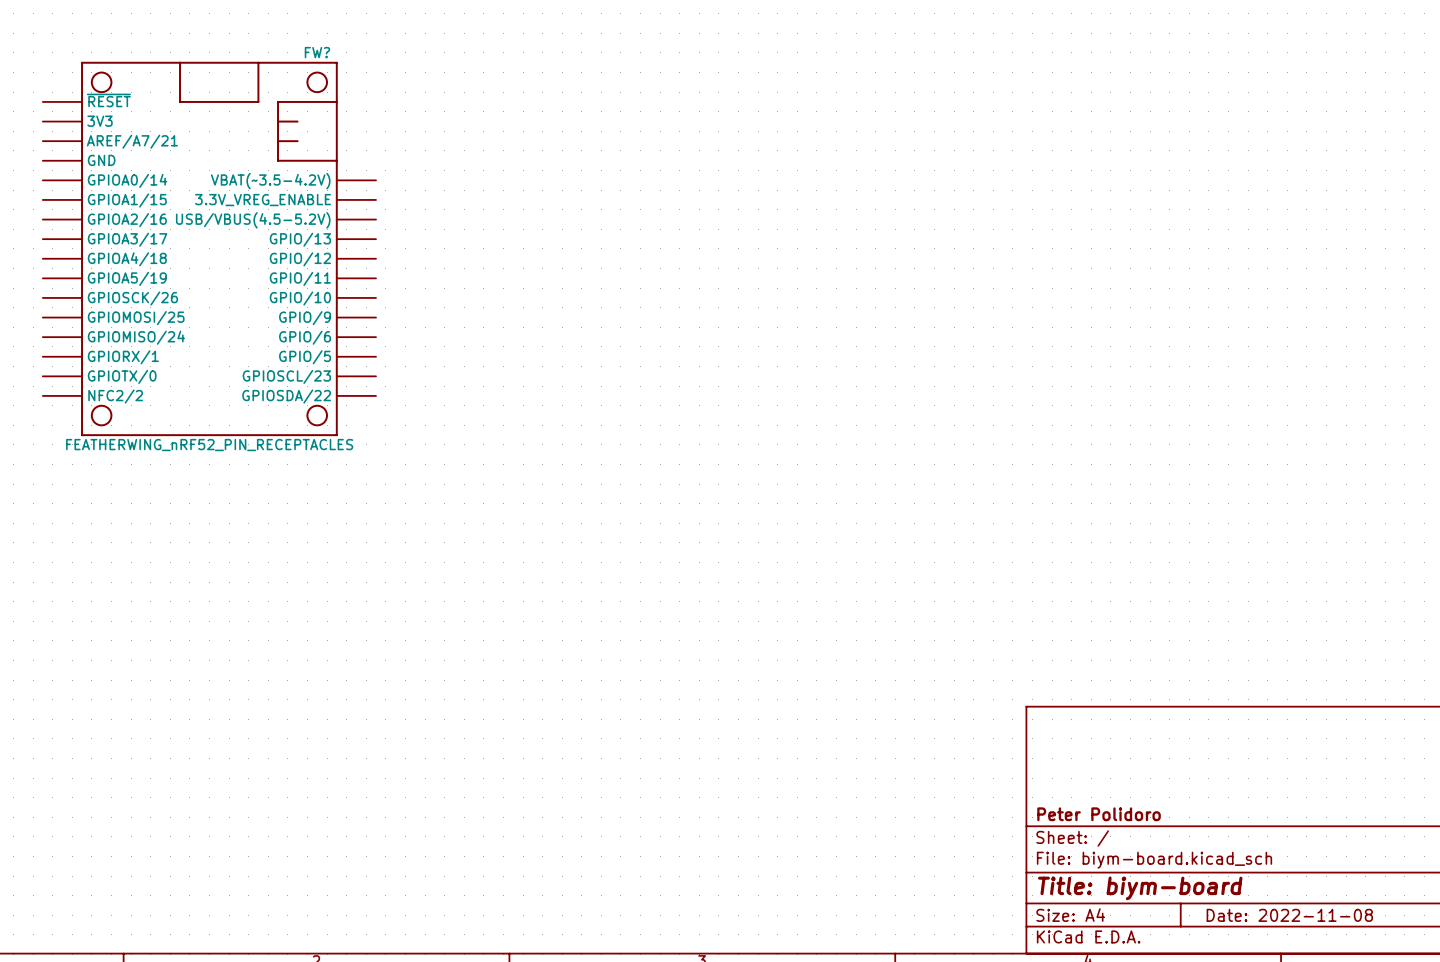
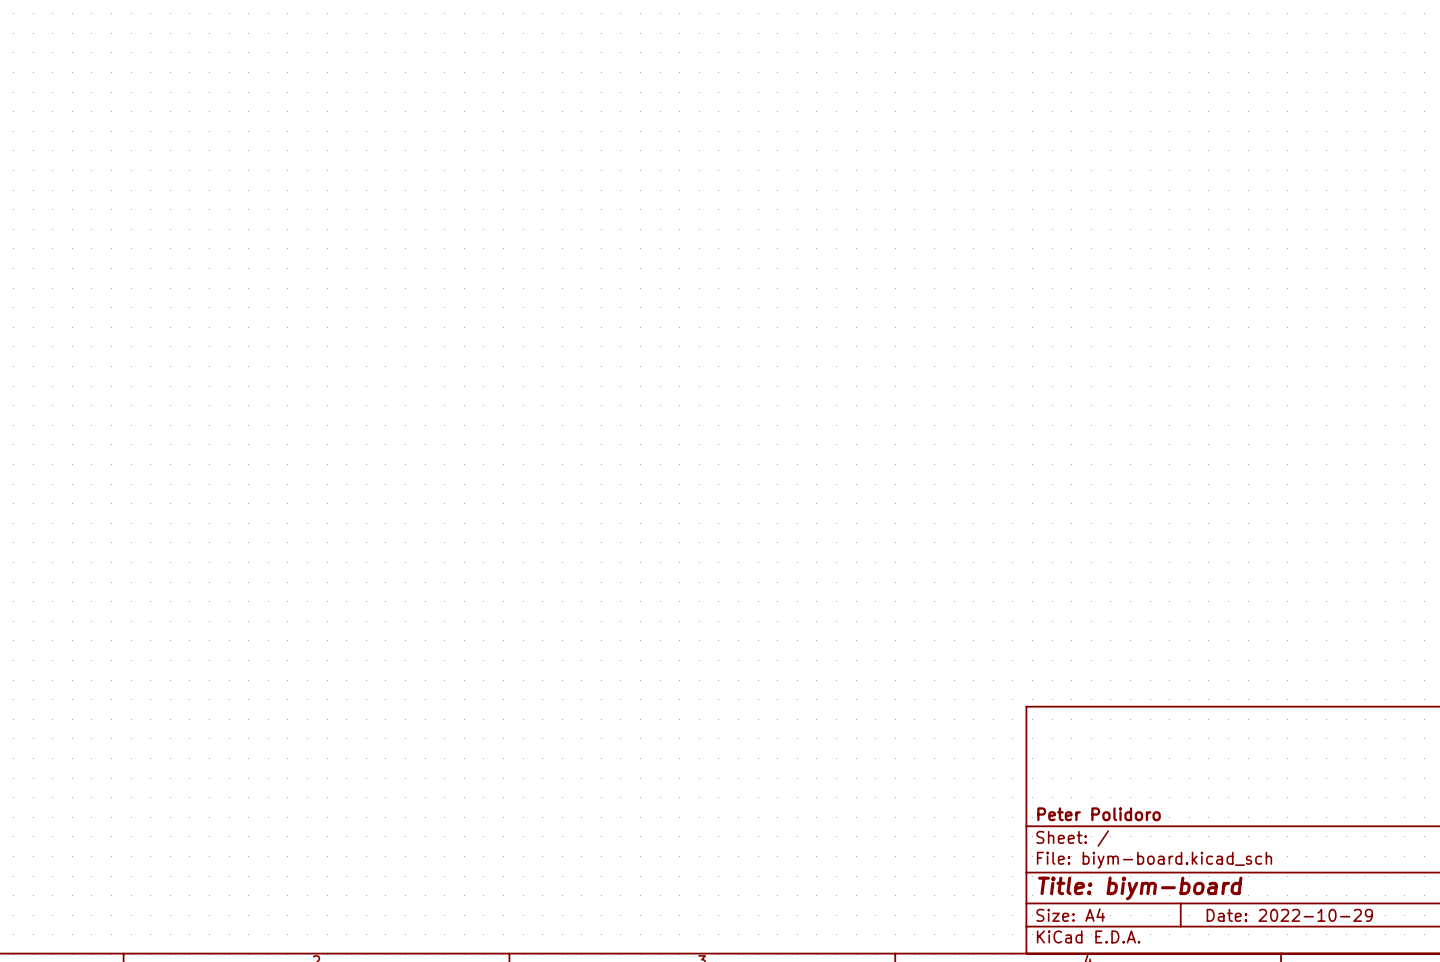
FW?: FEATHERWING_nRF52_PIN_RECEPTACLES (209, 248) -> none
title block: Date: 2022-11-08 (1289, 915) -> Date: 2022-10-29 (1289, 915)

